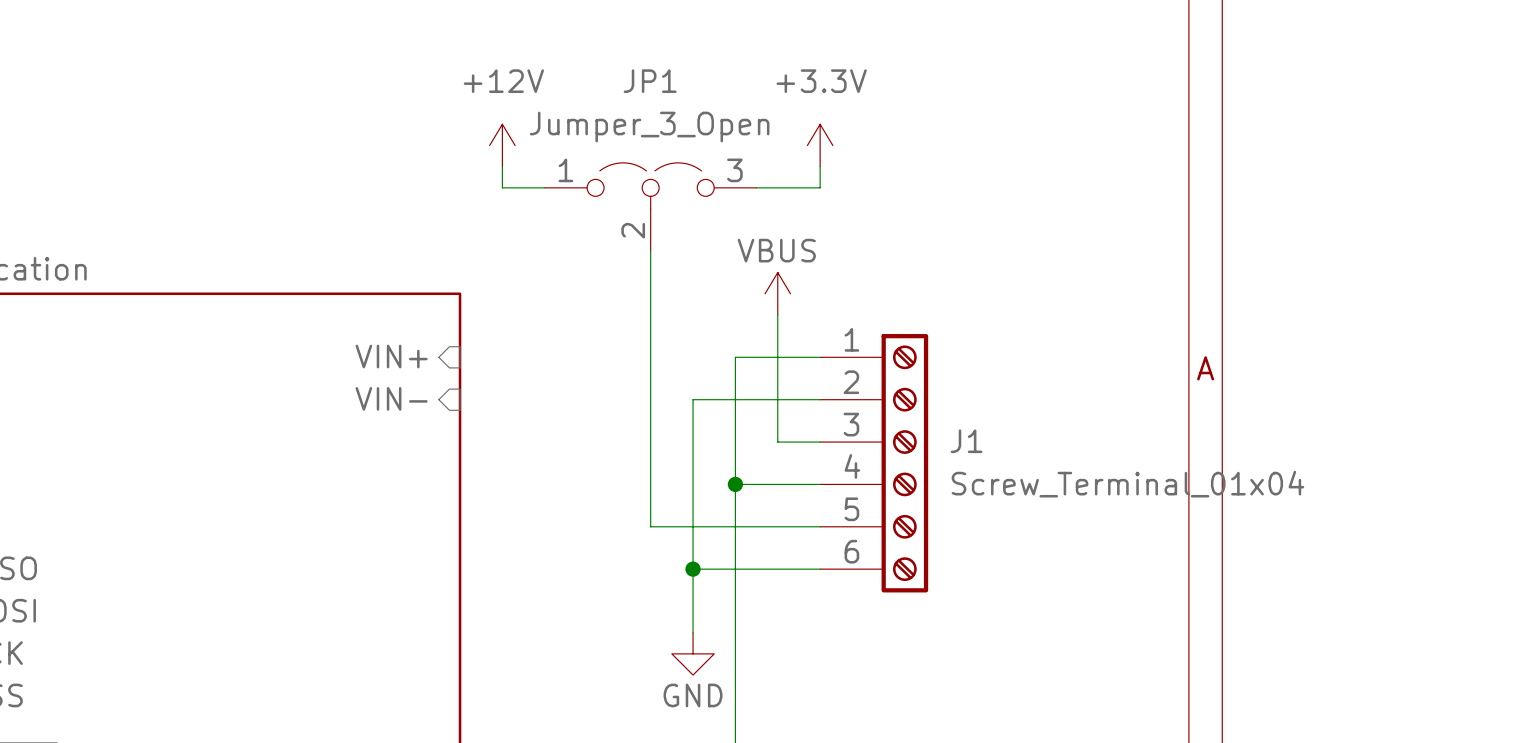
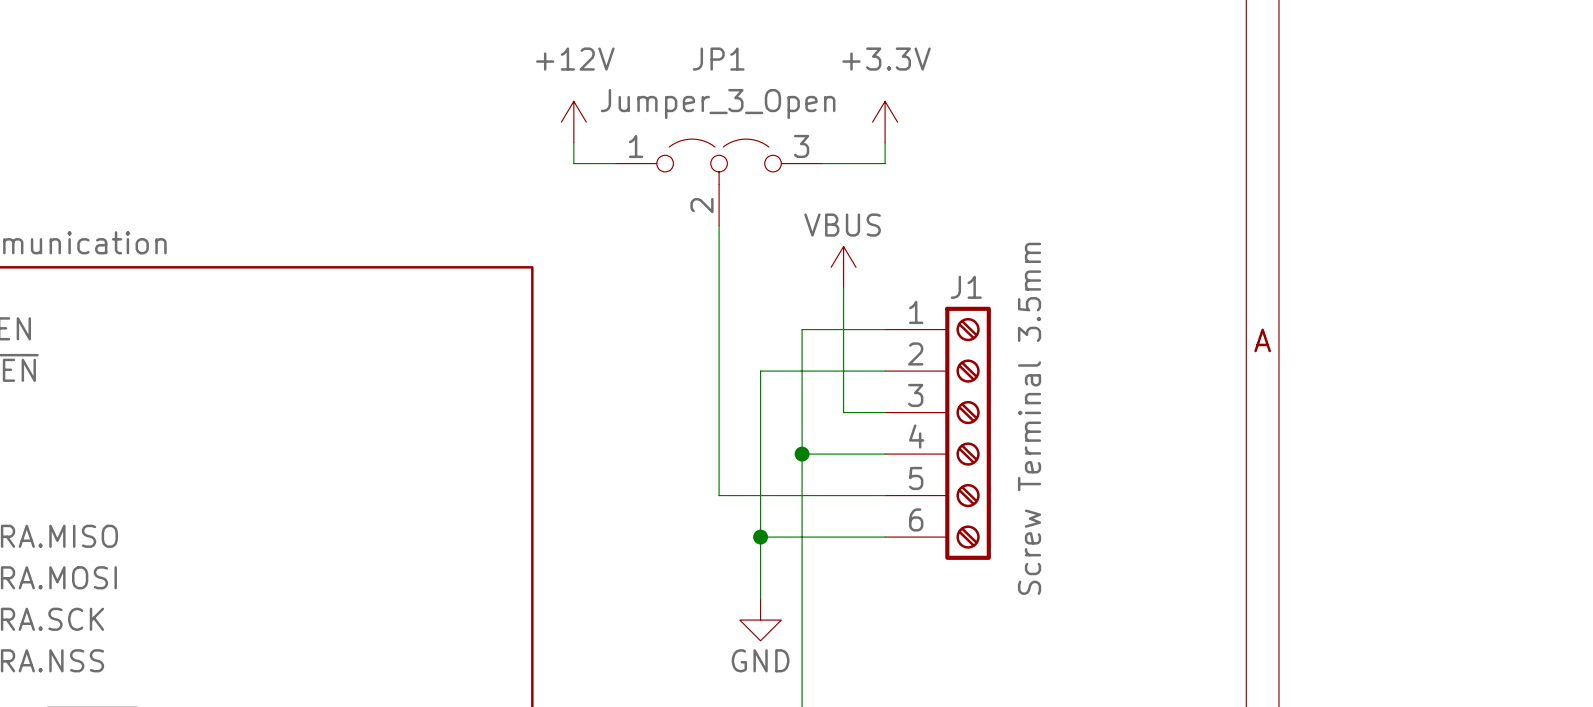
sheet pin: VIN+ (391, 356) -> none
sheet pin: VIN- (391, 398) -> none
J1 name position: J1 (966, 441) -> J1 (966, 287)
J1 value: Screw_Terminal_01x04 (1127, 484) -> Screw Terminal 3.5mm (1029, 418)

